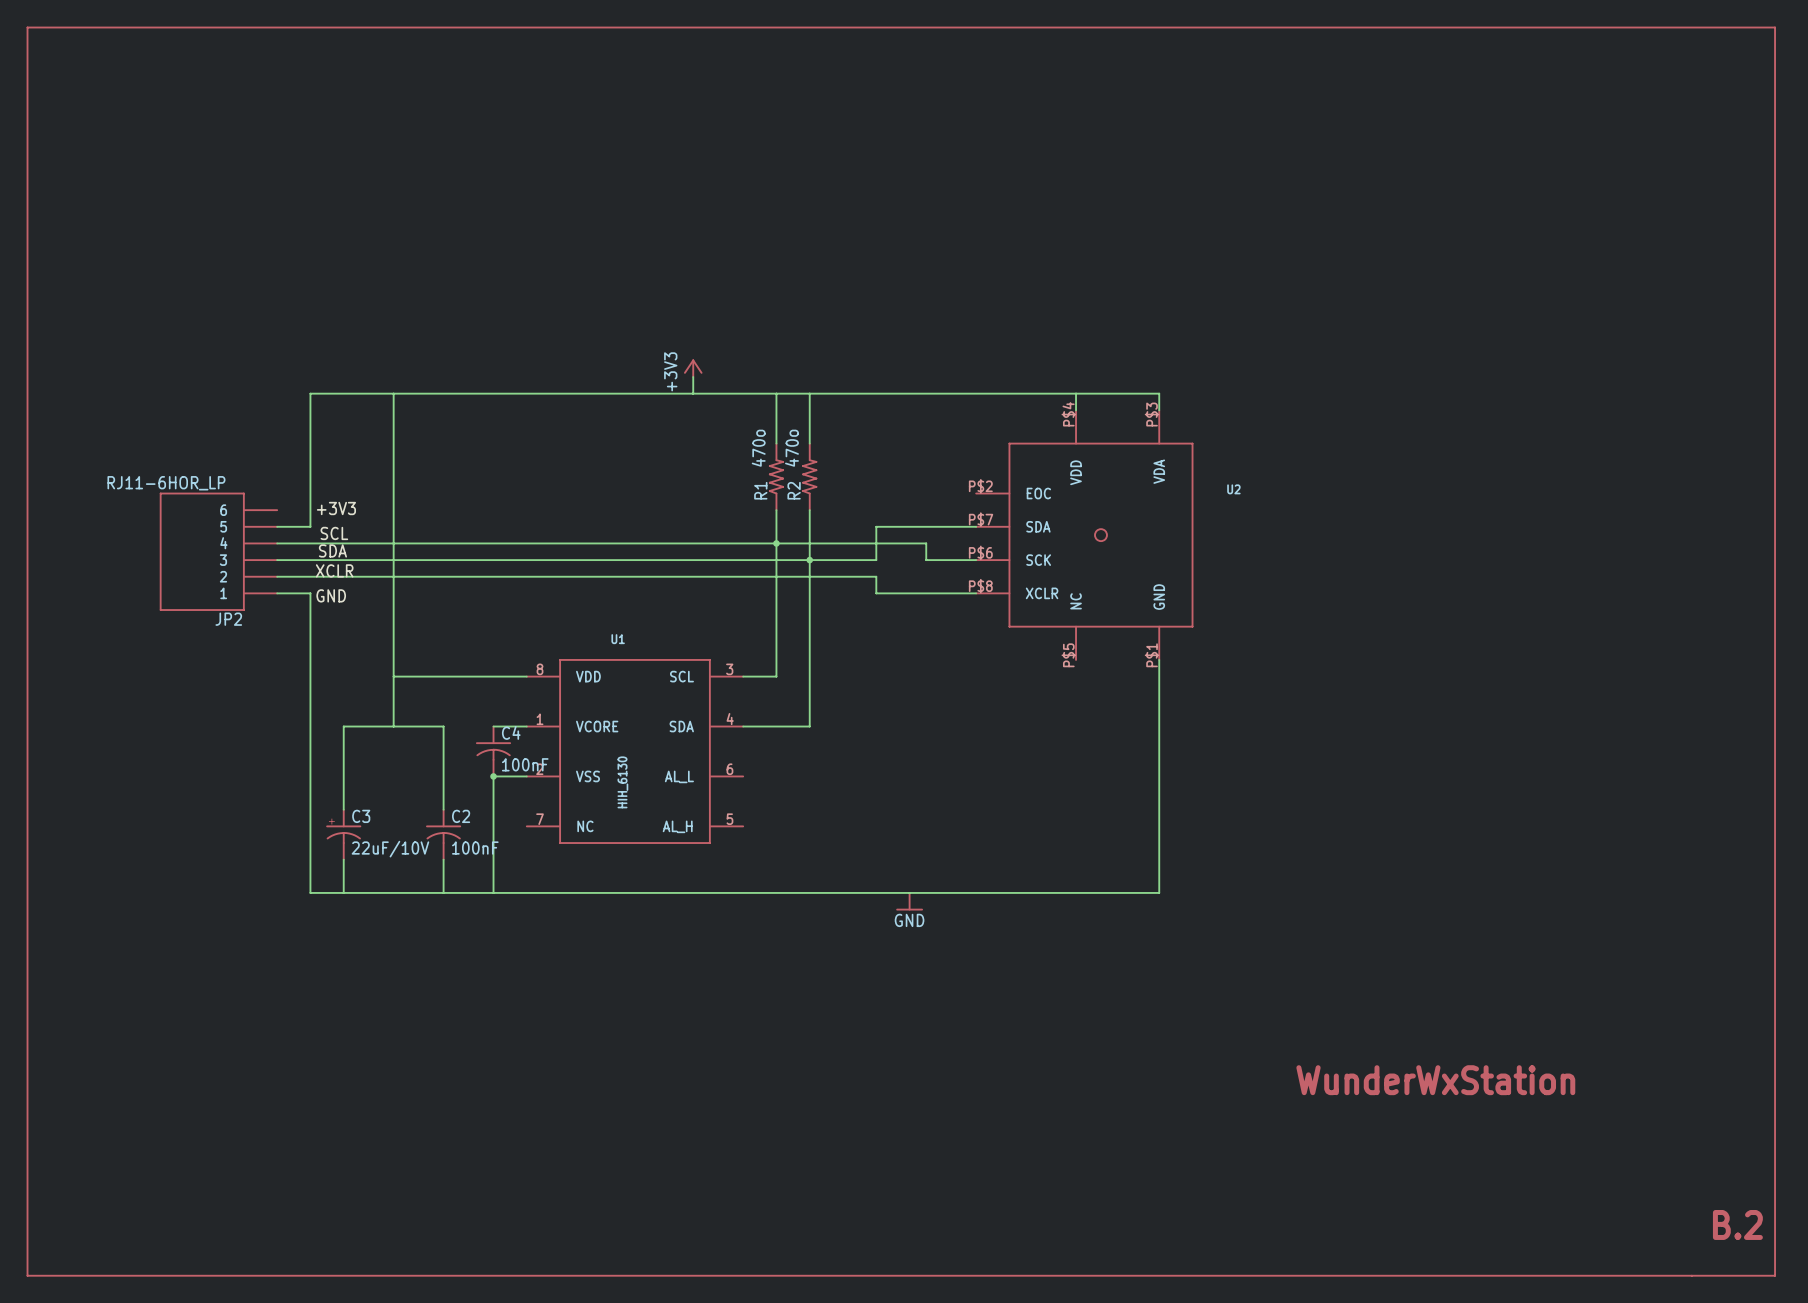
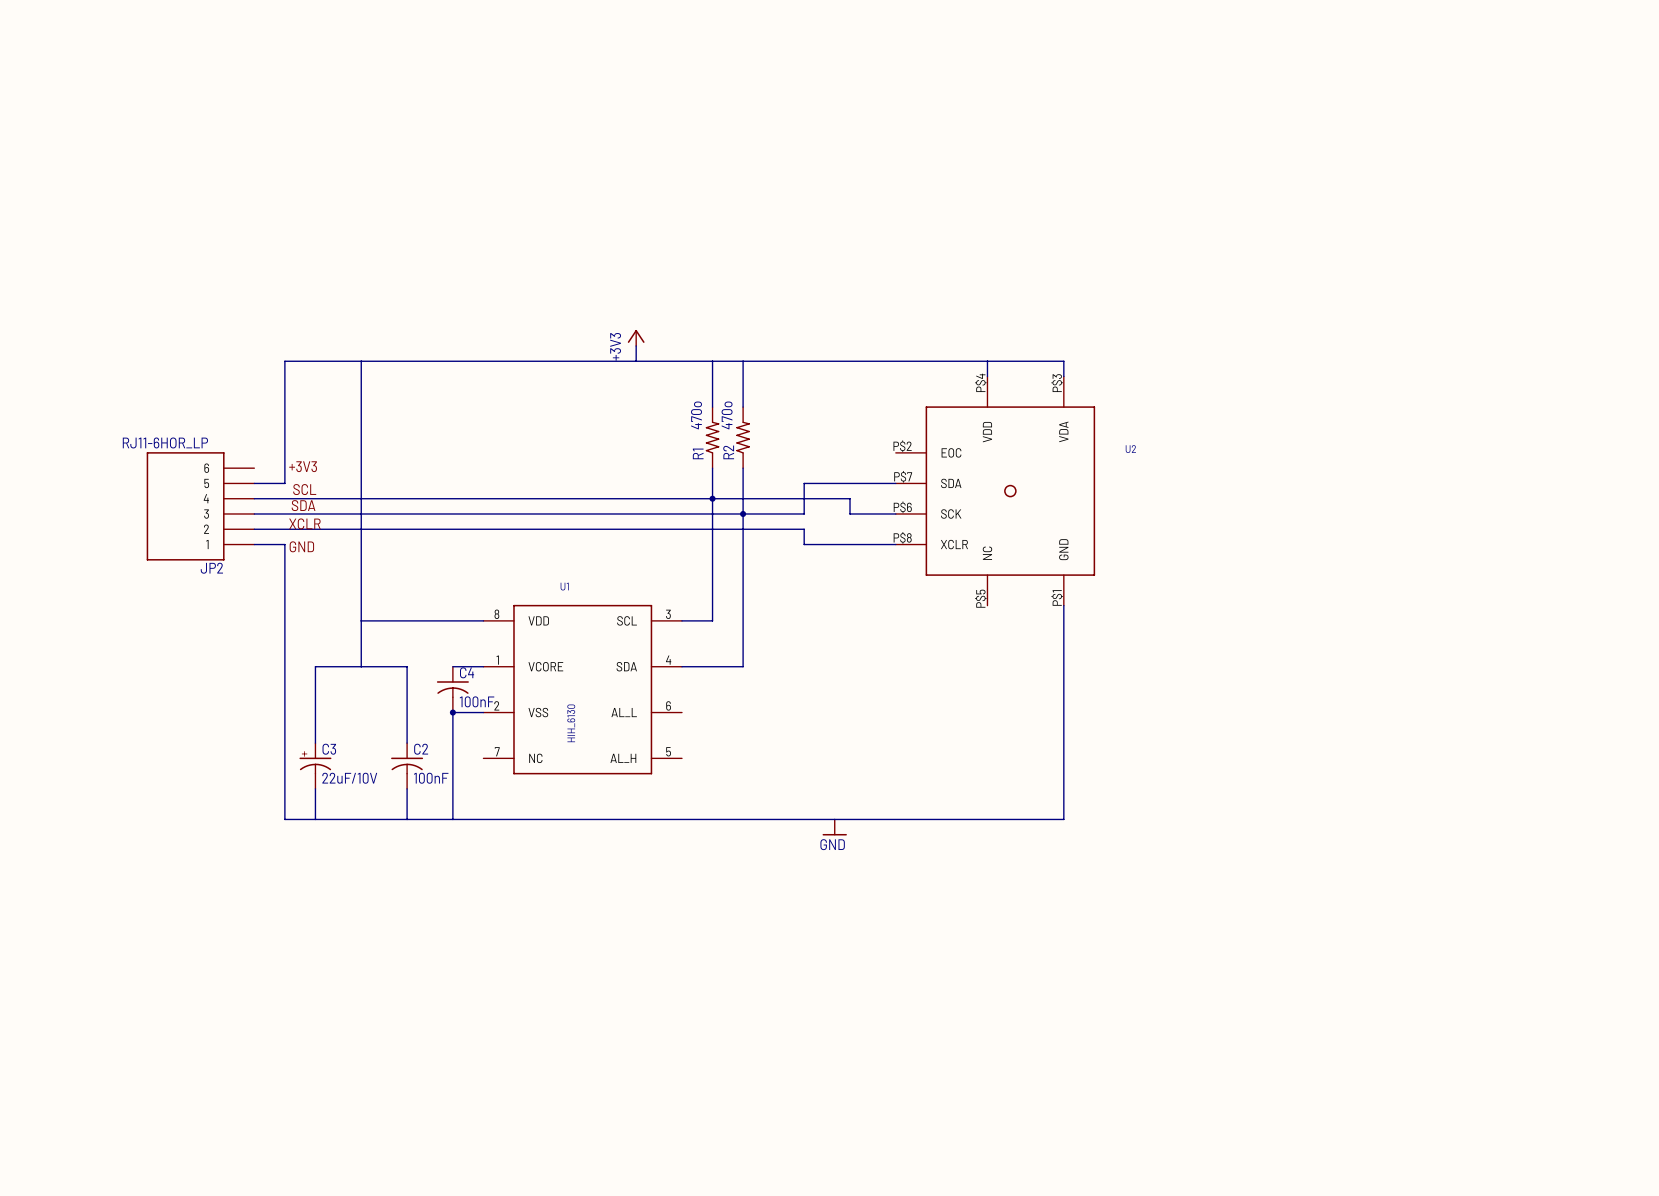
part: (901, 651) -> none
text: WunderWxStation (1435, 1080) -> none
text: B.2 (1737, 1224) -> none

